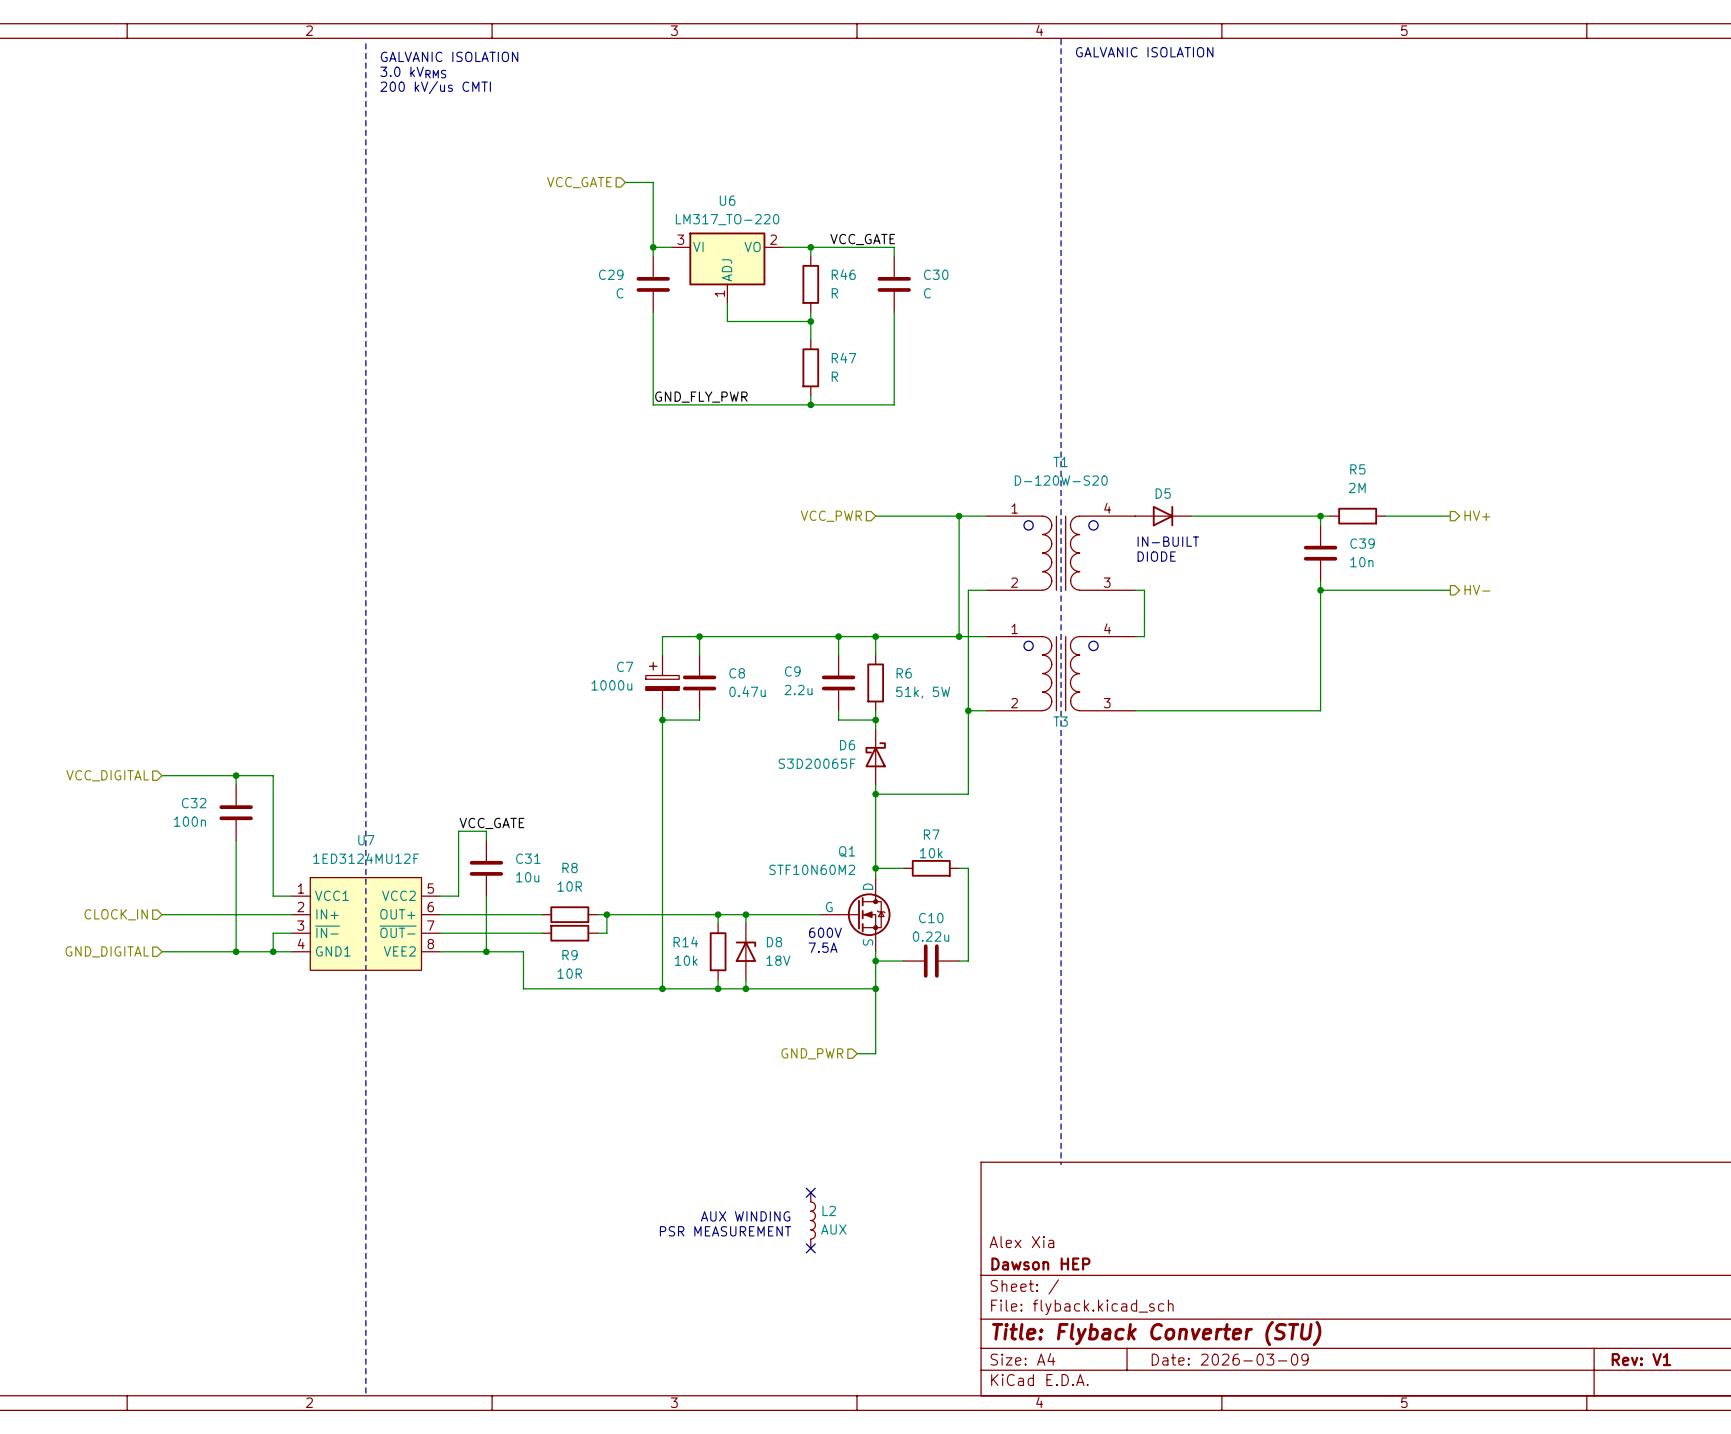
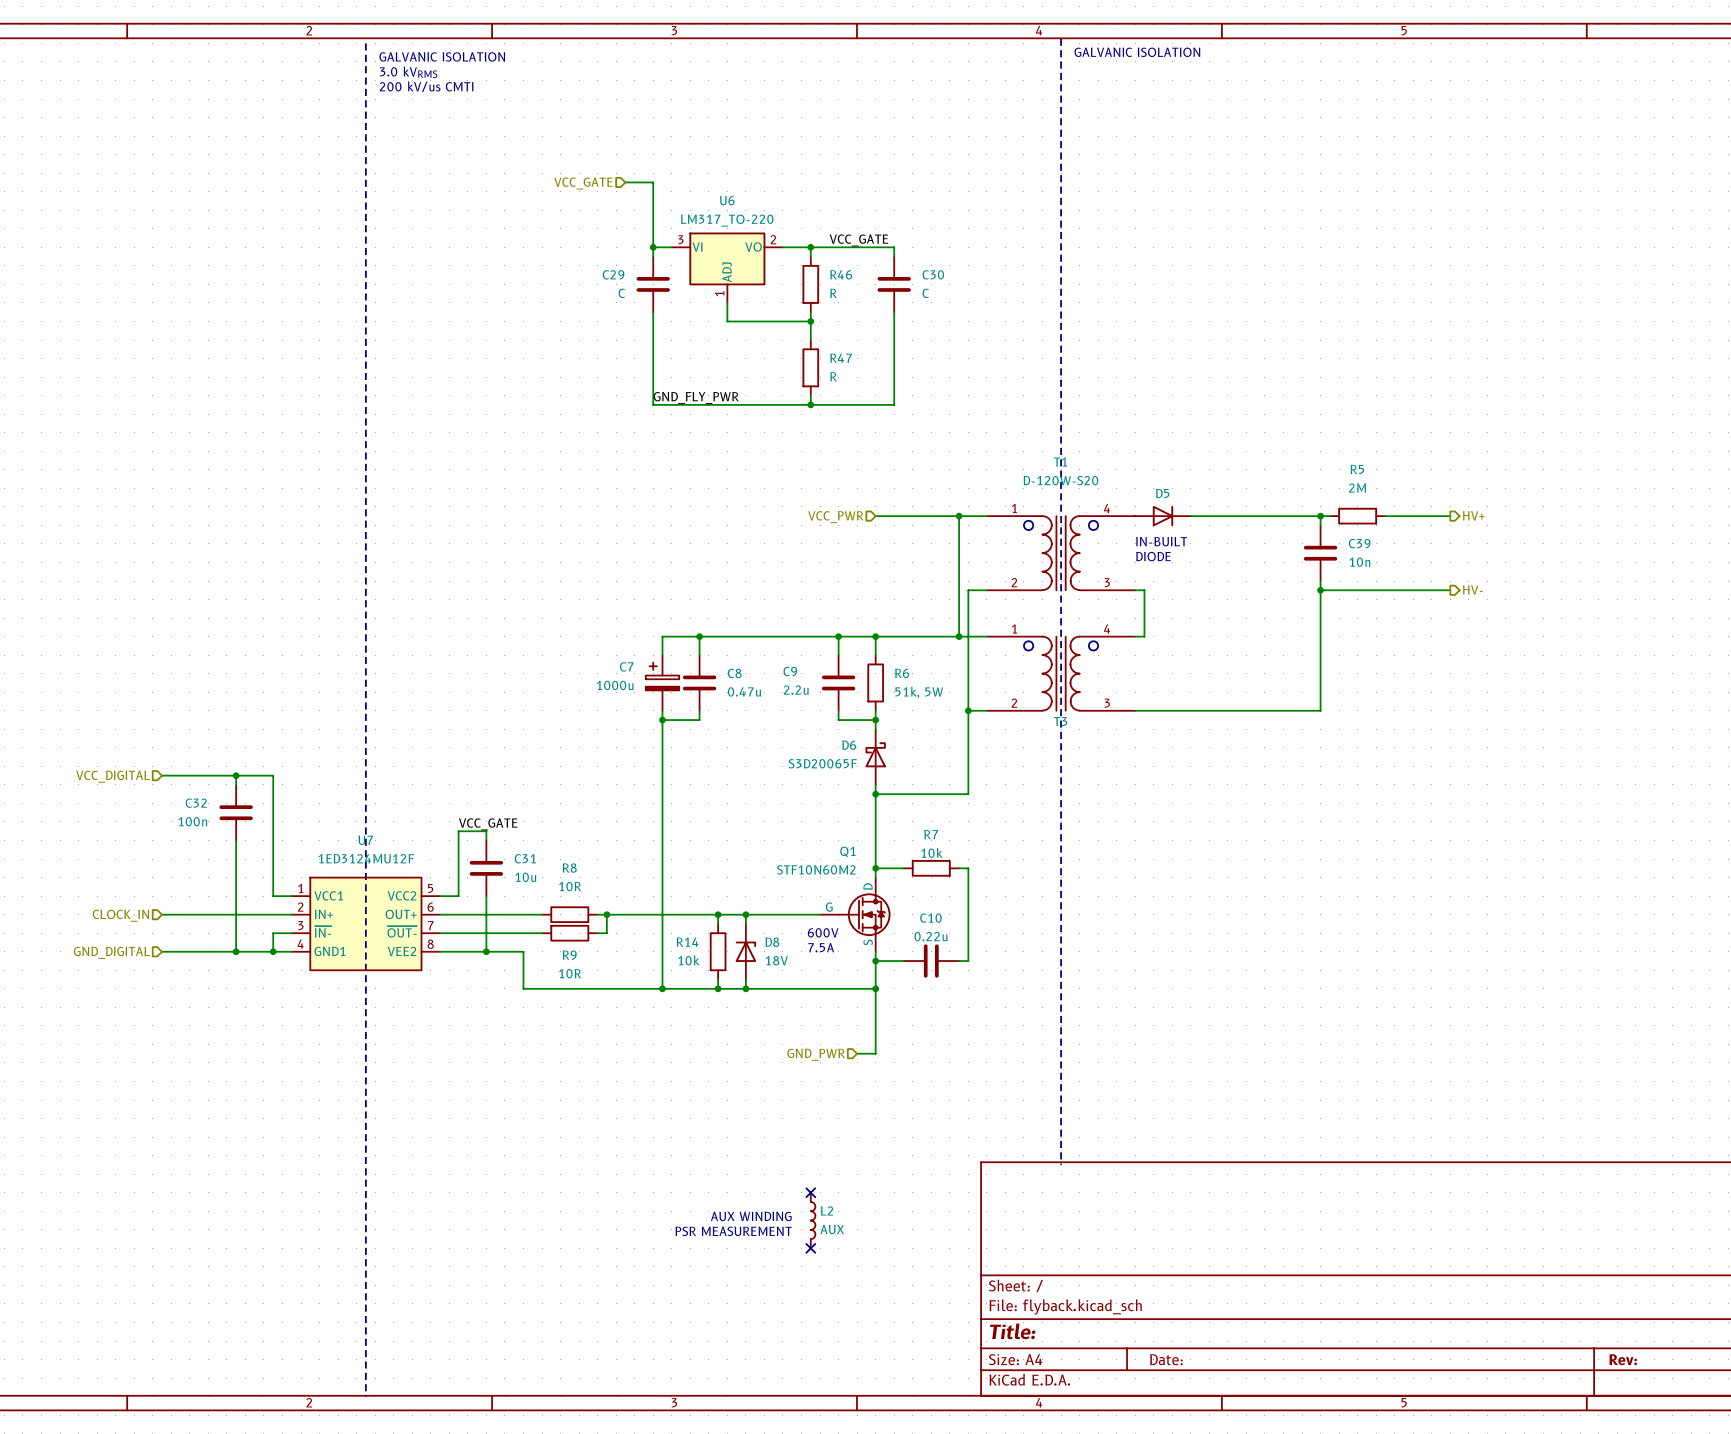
title block: Alex Xia (1021, 1242) -> none
title block: Dawson HEP (1040, 1264) -> none
title block: Title: Flyback Converter (STU) (1156, 1333) -> Title: (1012, 1331)
title block: Date: 2026-03-09 (1230, 1359) -> Date: (1166, 1359)
title block: Rev: V1 (1641, 1359) -> Rev: (1623, 1359)

